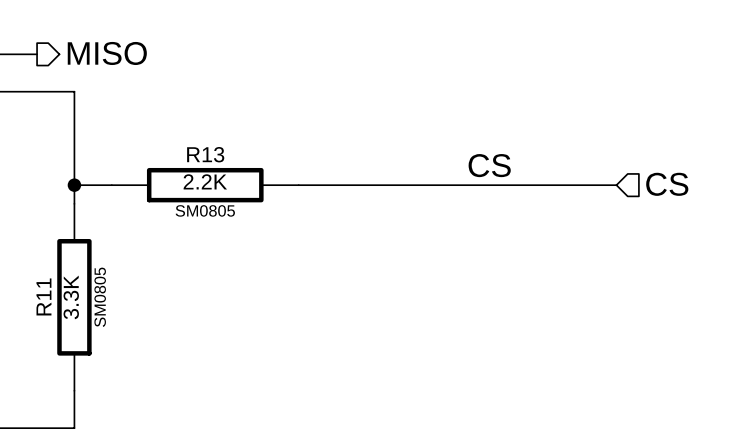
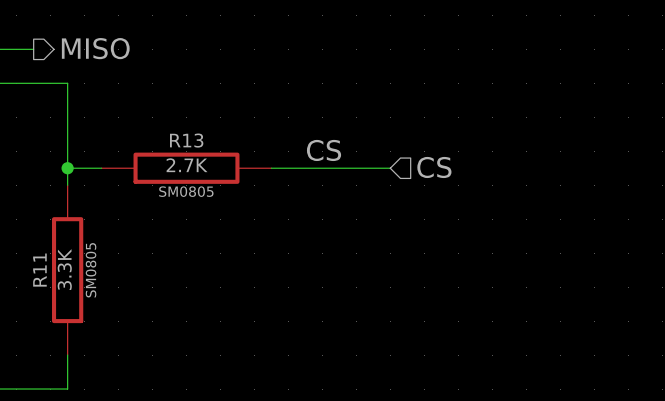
label position: CS (489, 165) -> CS (324, 150)
R13 value: 2.2K (205, 181) -> 2.7K (187, 165)
hierarchical label position: CS (667, 184) -> CS (434, 167)
wire: (429, 185) (616, 185) -> none

